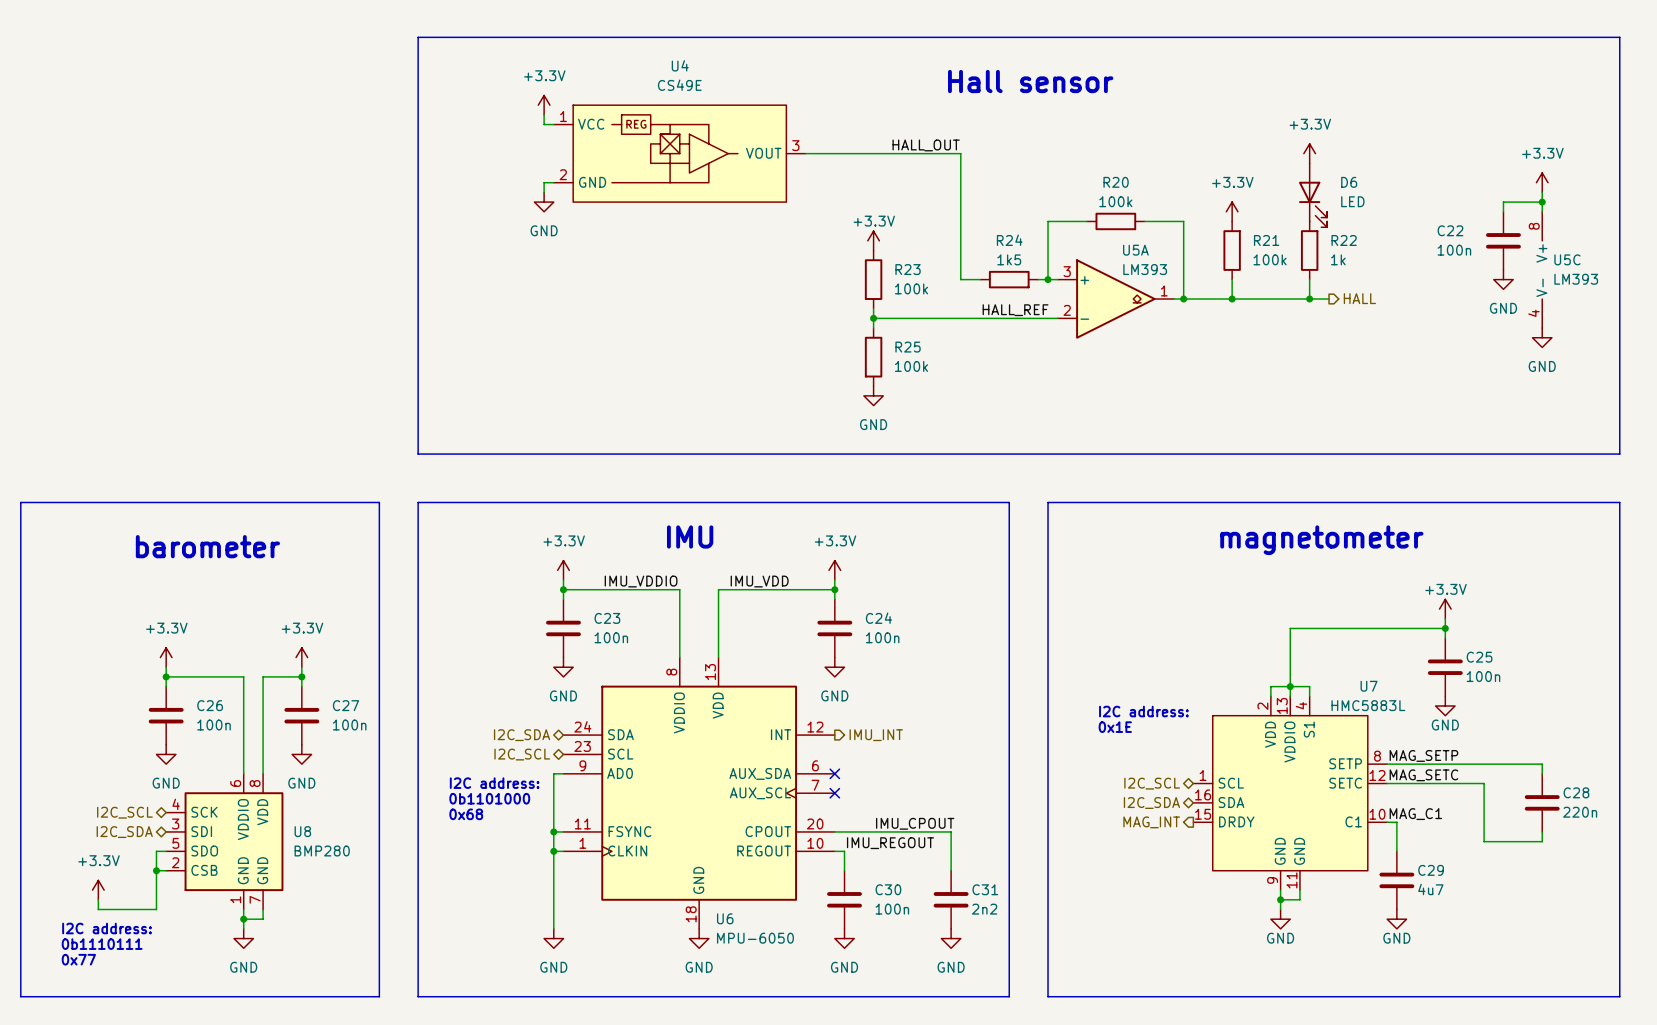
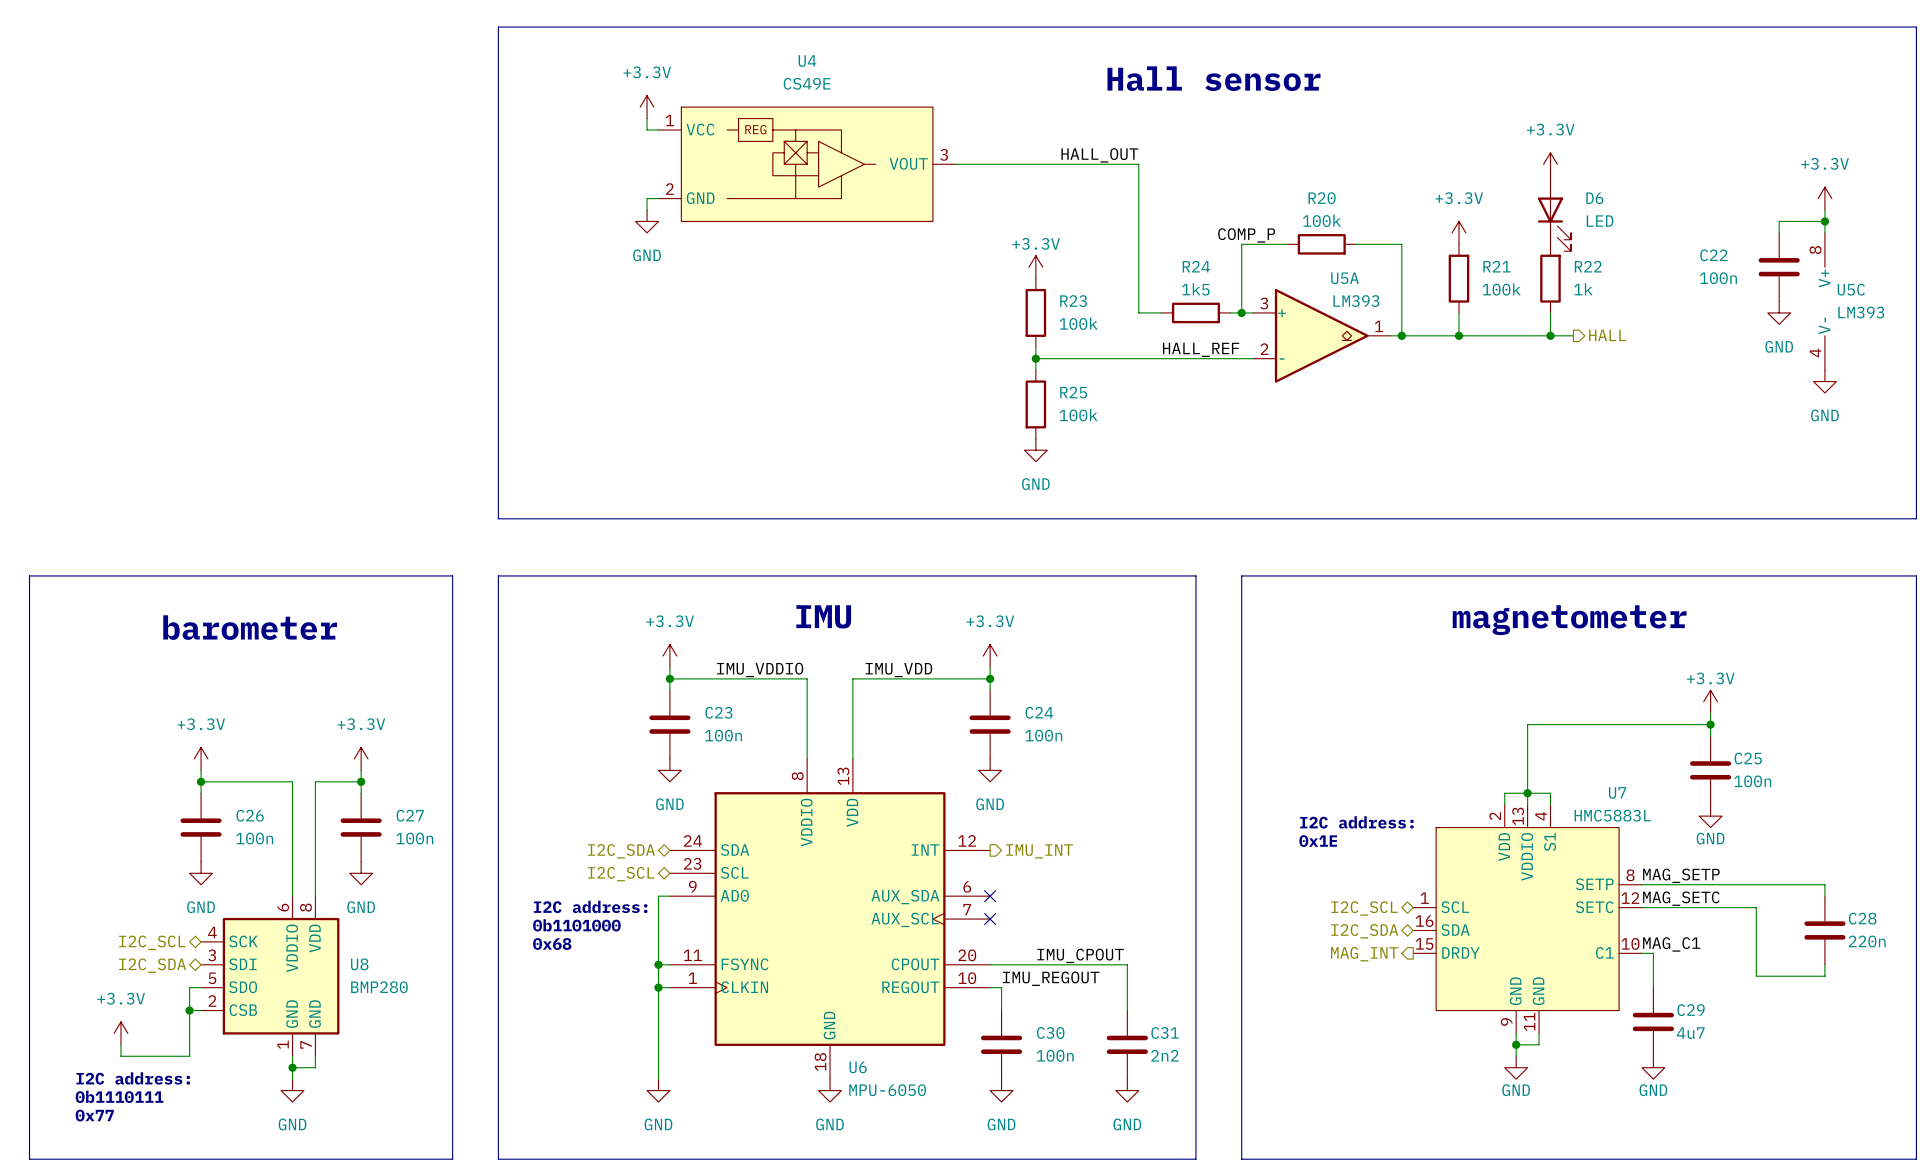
label: none -> COMP_P (1246, 235)

